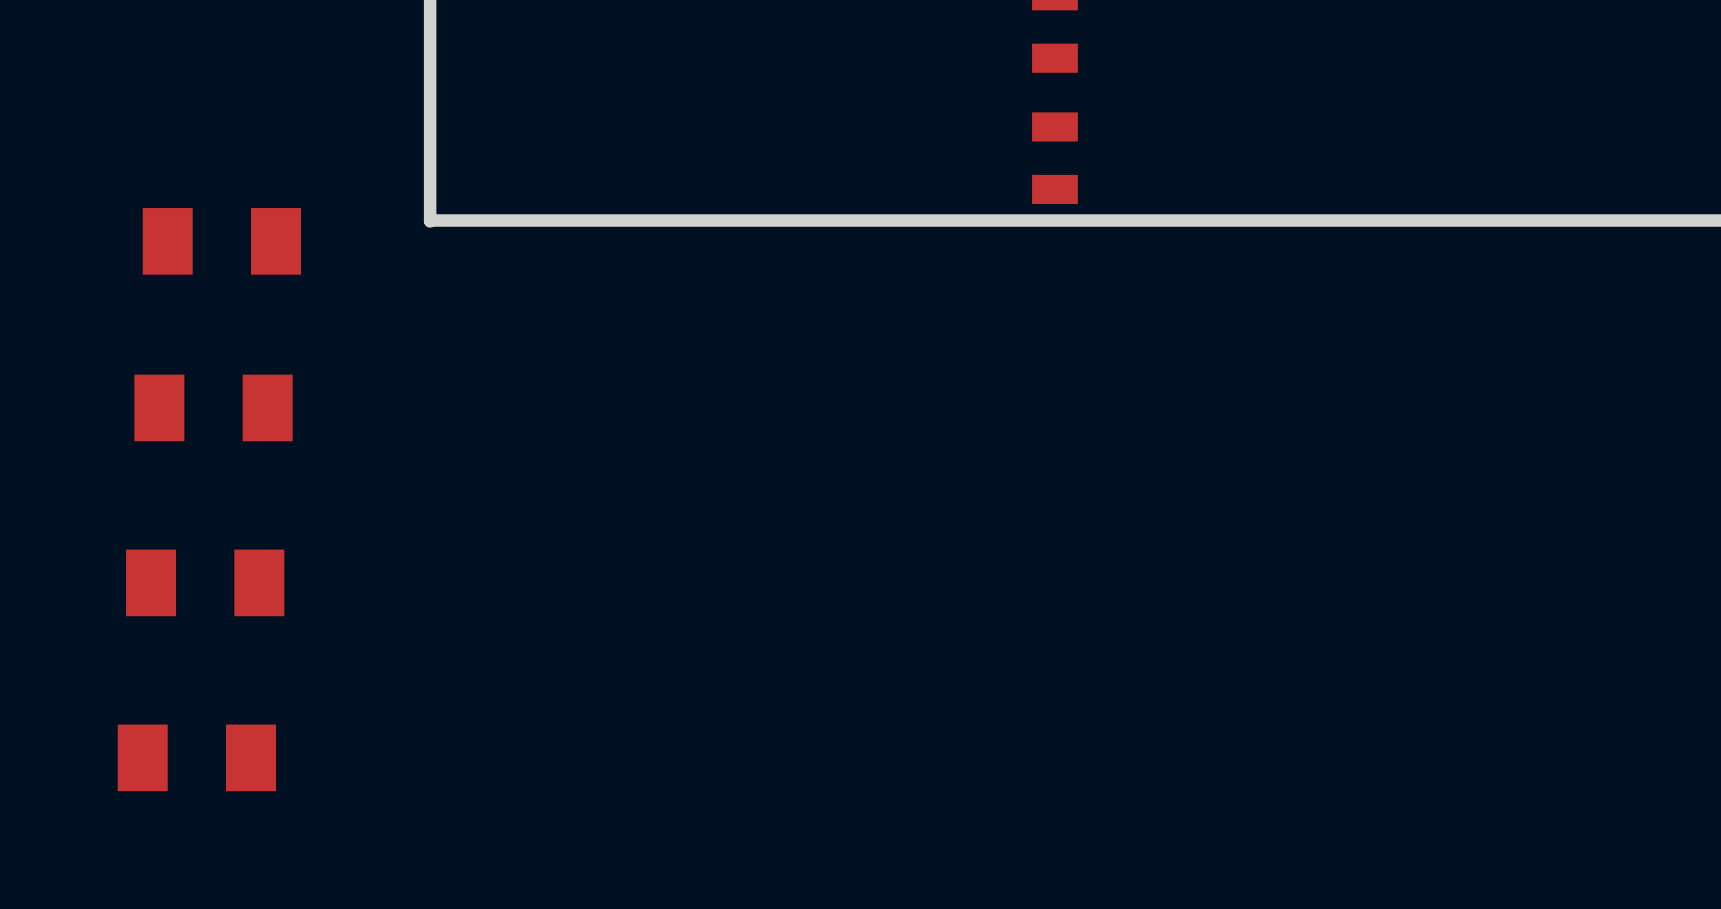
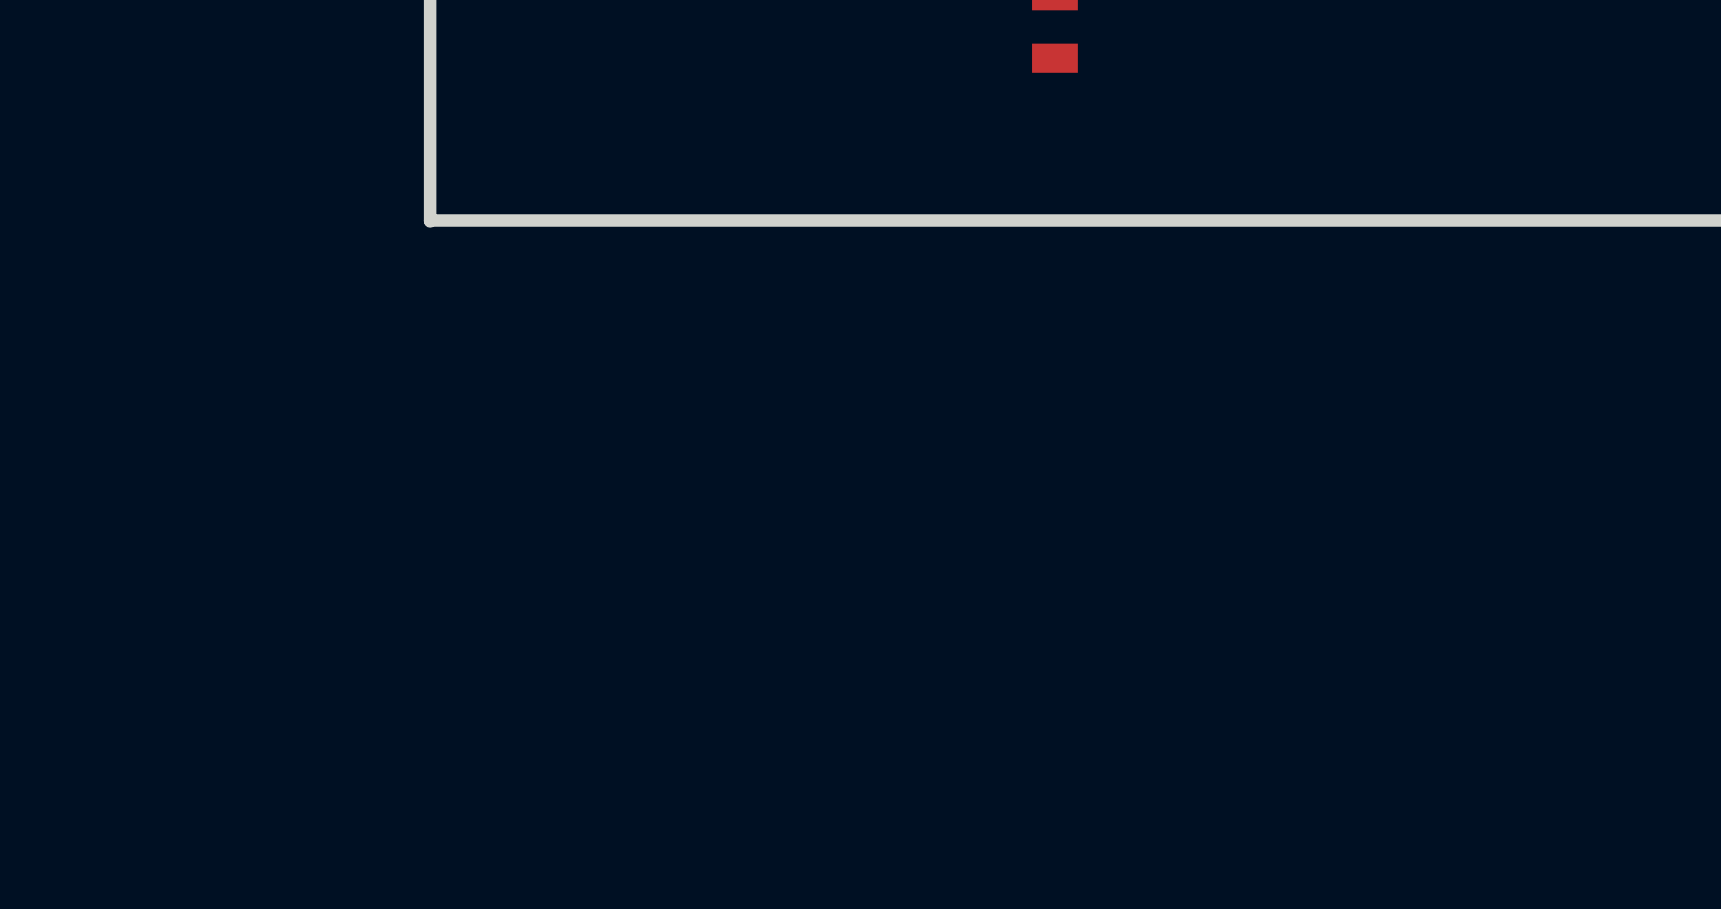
part: (1054, 158) -> none
part: (221, 241) -> none
part: (213, 407) -> none
part: (205, 582) -> none
part: (196, 757) -> none

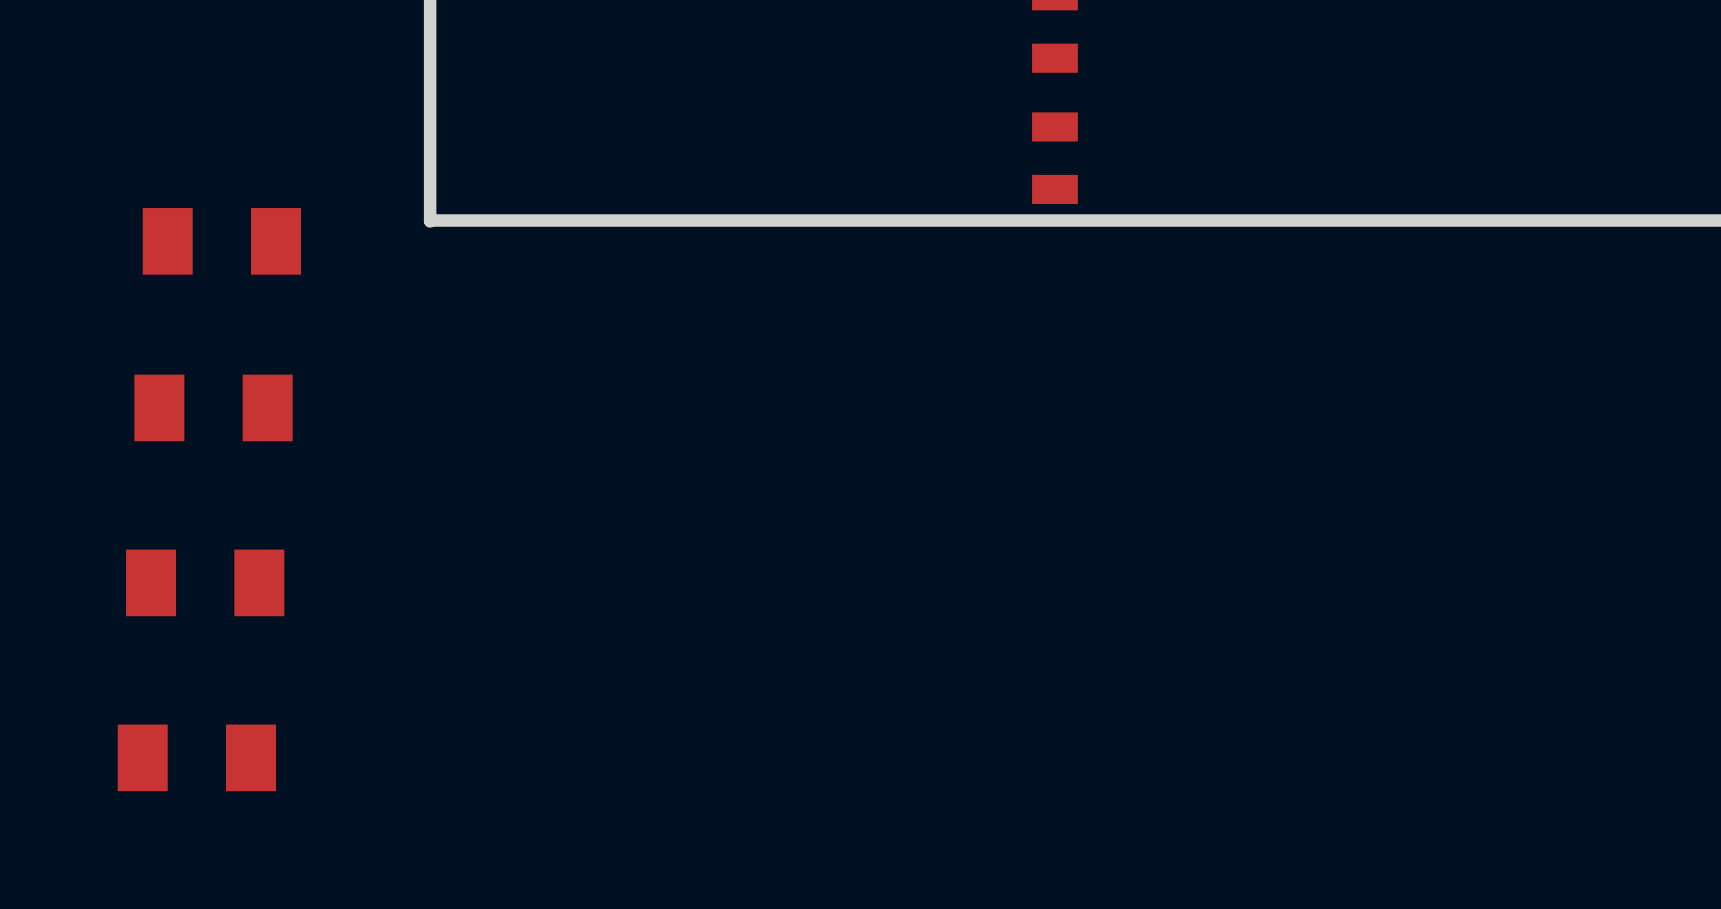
part: none -> (1054, 158)
part: none -> (221, 241)
part: none -> (213, 407)
part: none -> (205, 582)
part: none -> (196, 757)

